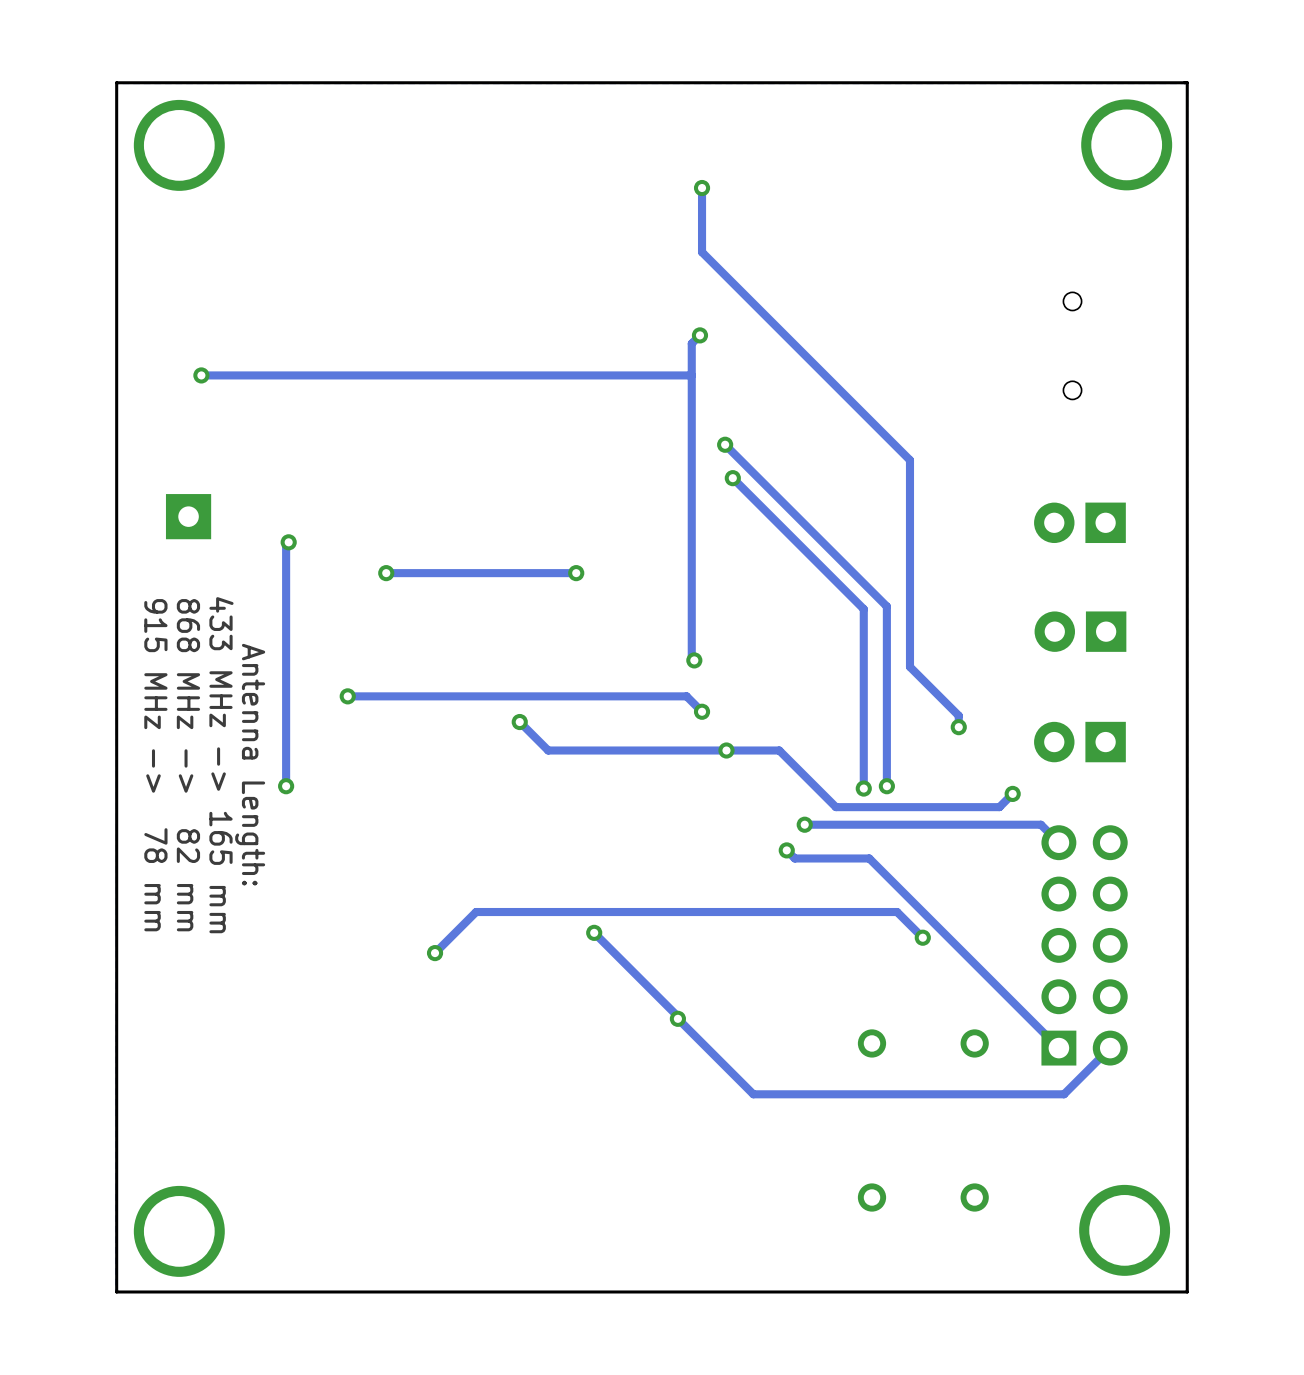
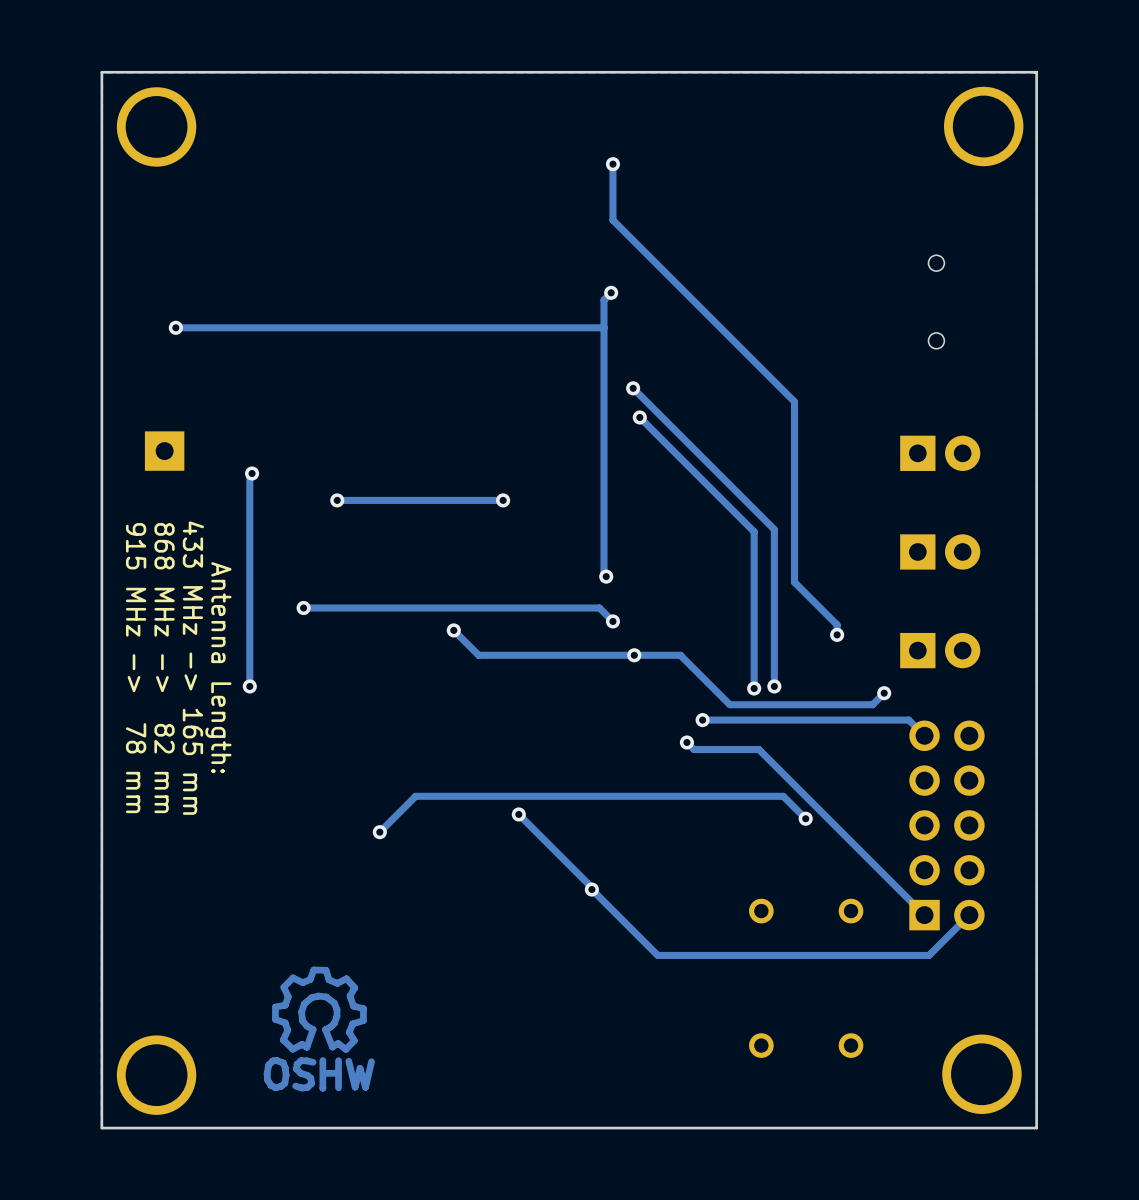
part rotation: 0° (1079, 522) -> 180° (940, 453)
part rotation: 0° (1080, 631) -> 180° (940, 551)
part rotation: 0° (1079, 742) -> 180° (940, 650)
drawing: none -> [263, 966, 375, 1092]

